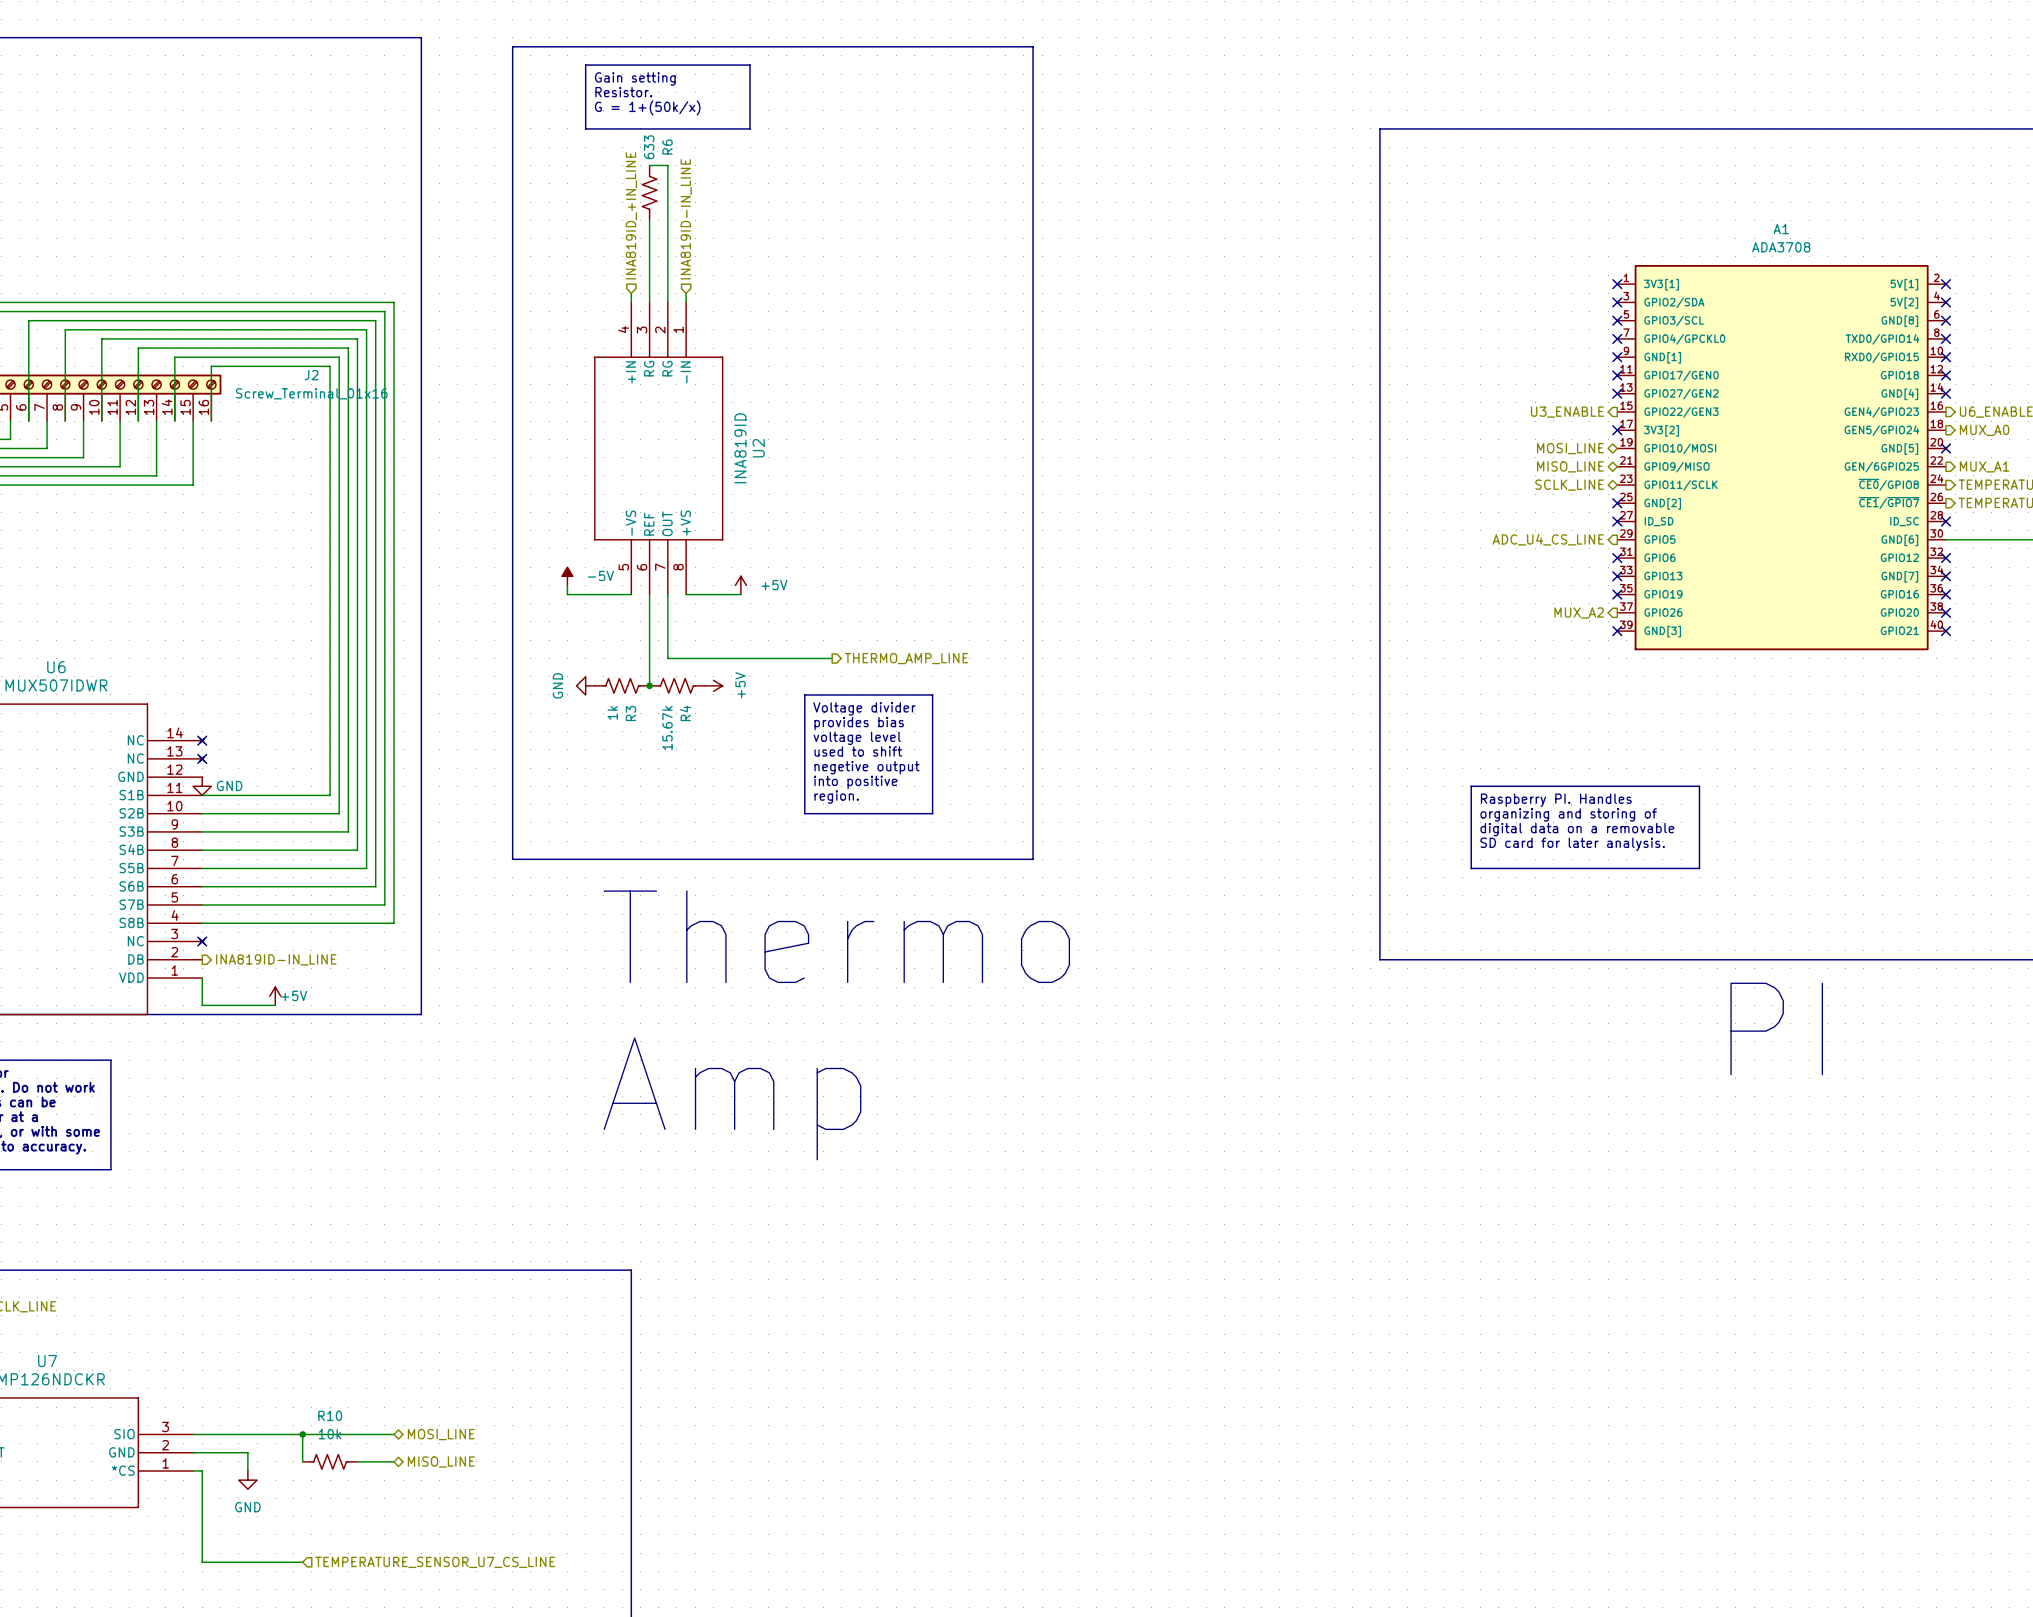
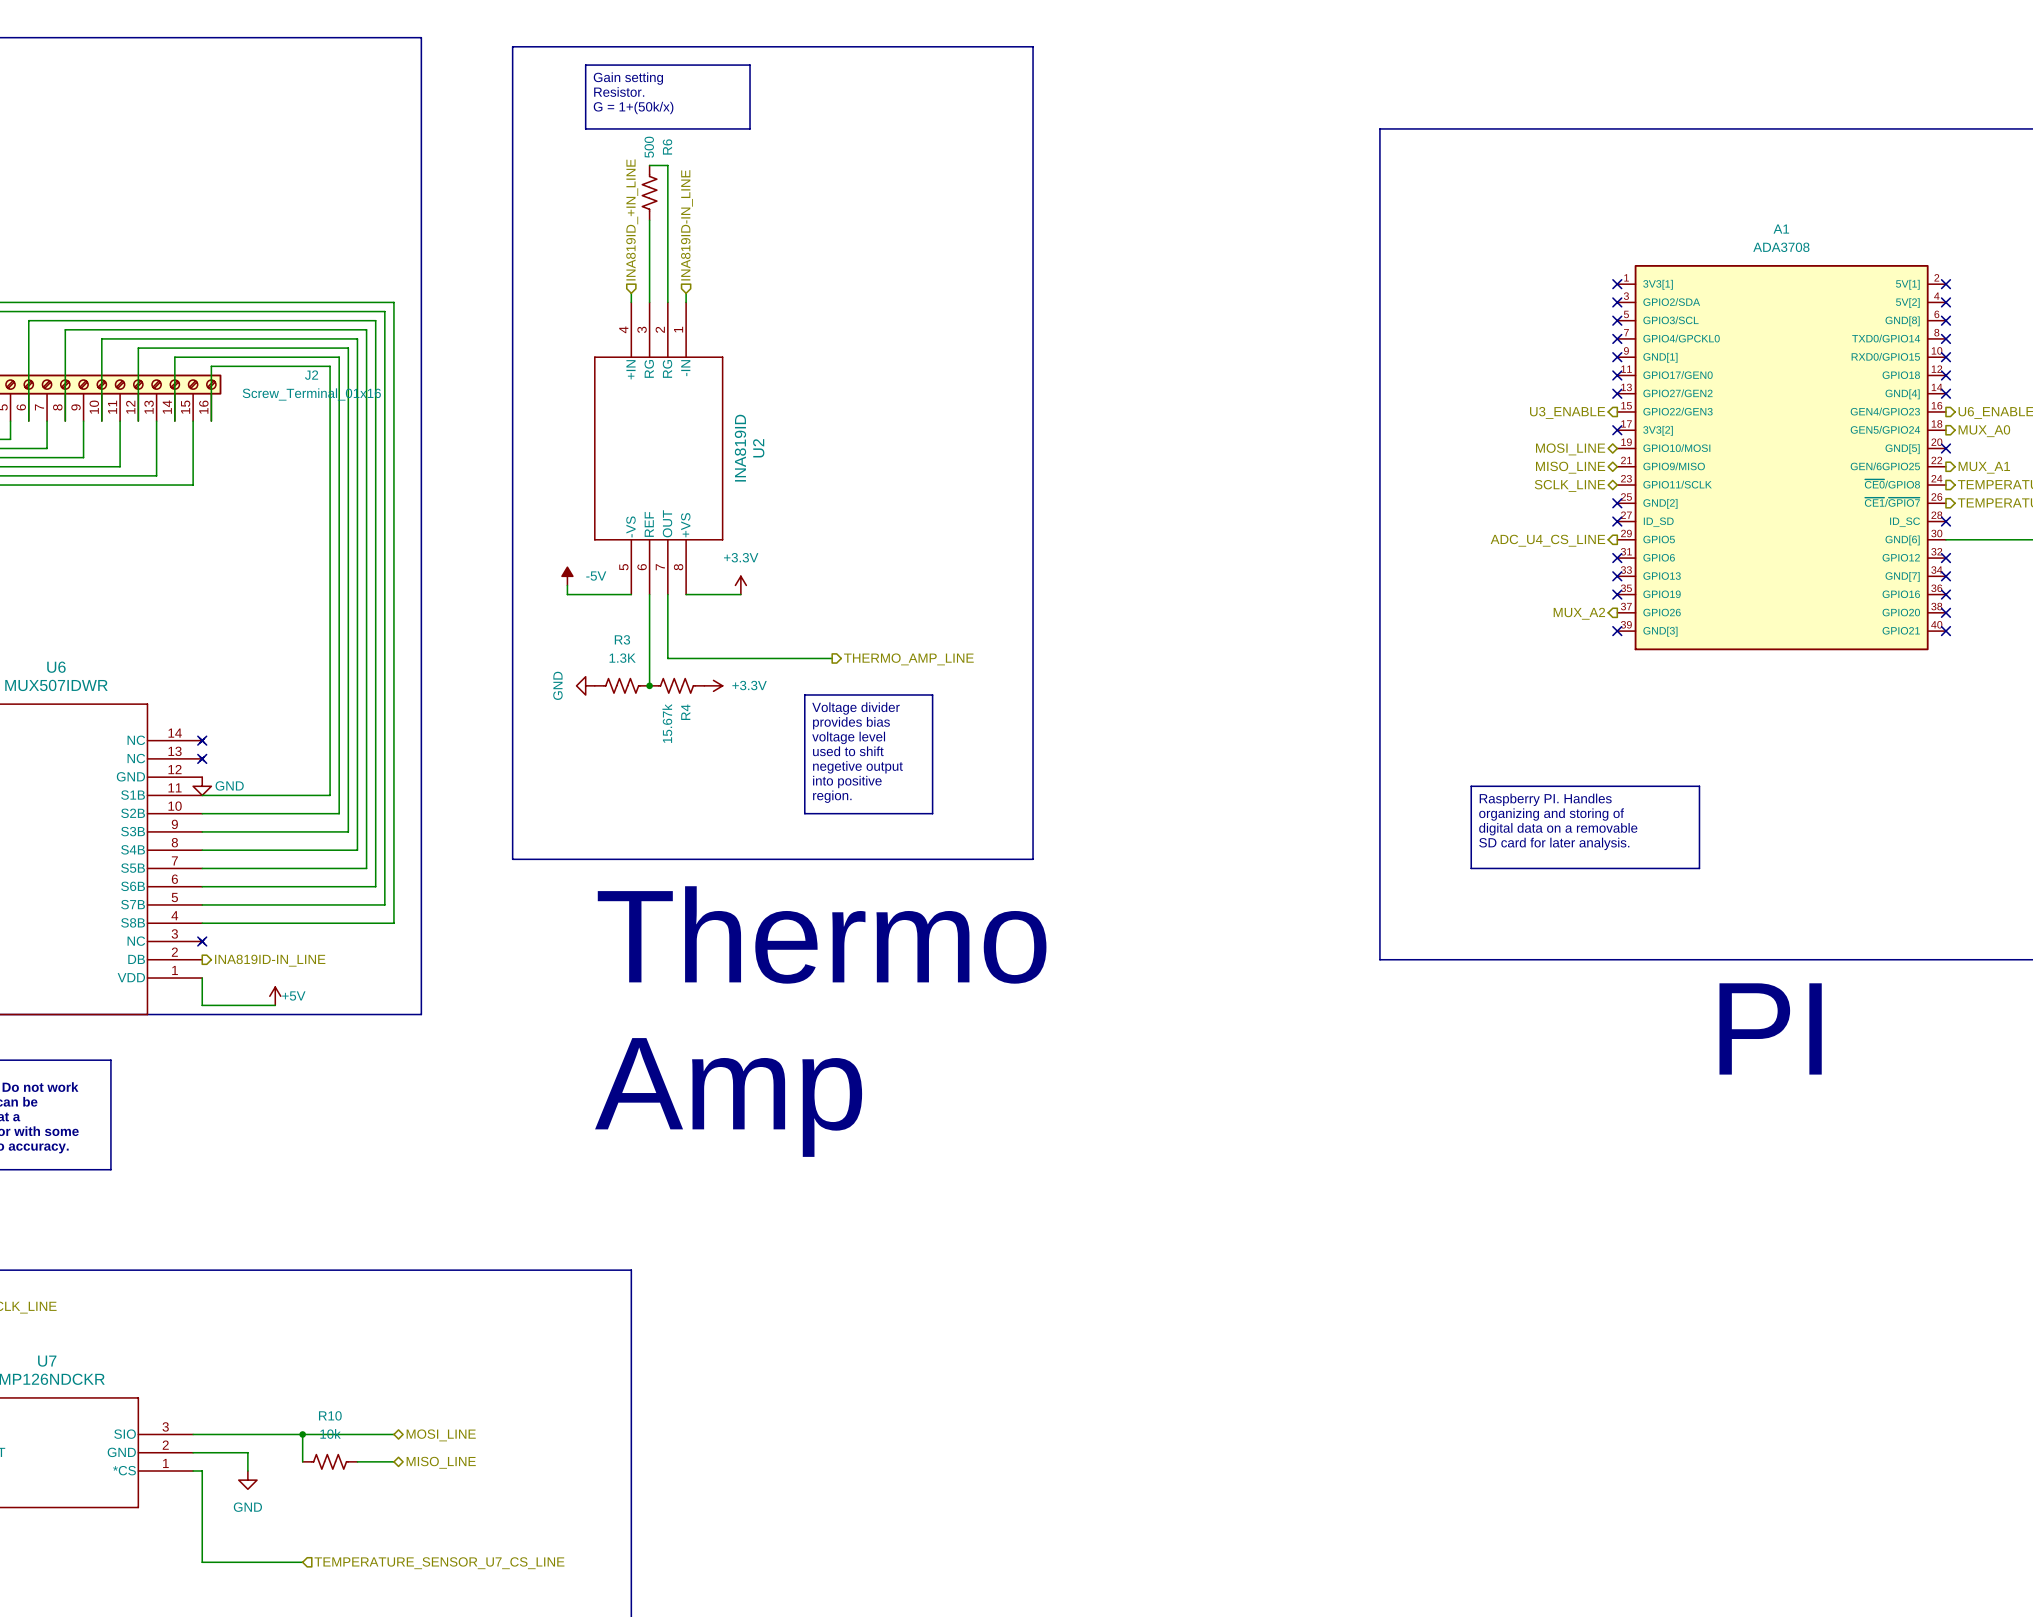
R6 value: 633 (649, 147) -> 500 (649, 147)
power symbol: +5V (740, 585) -> +3.3V (740, 585)
power symbol: +5V (713, 685) -> +3.3V (713, 685)
R3 value: 1k (612, 712) -> 1.3K (622, 658)
R3 name rotation: 0° (630, 713) -> 90° clockwise (622, 639)
R3 name position: R3 (630, 713) -> R3 (622, 639)

